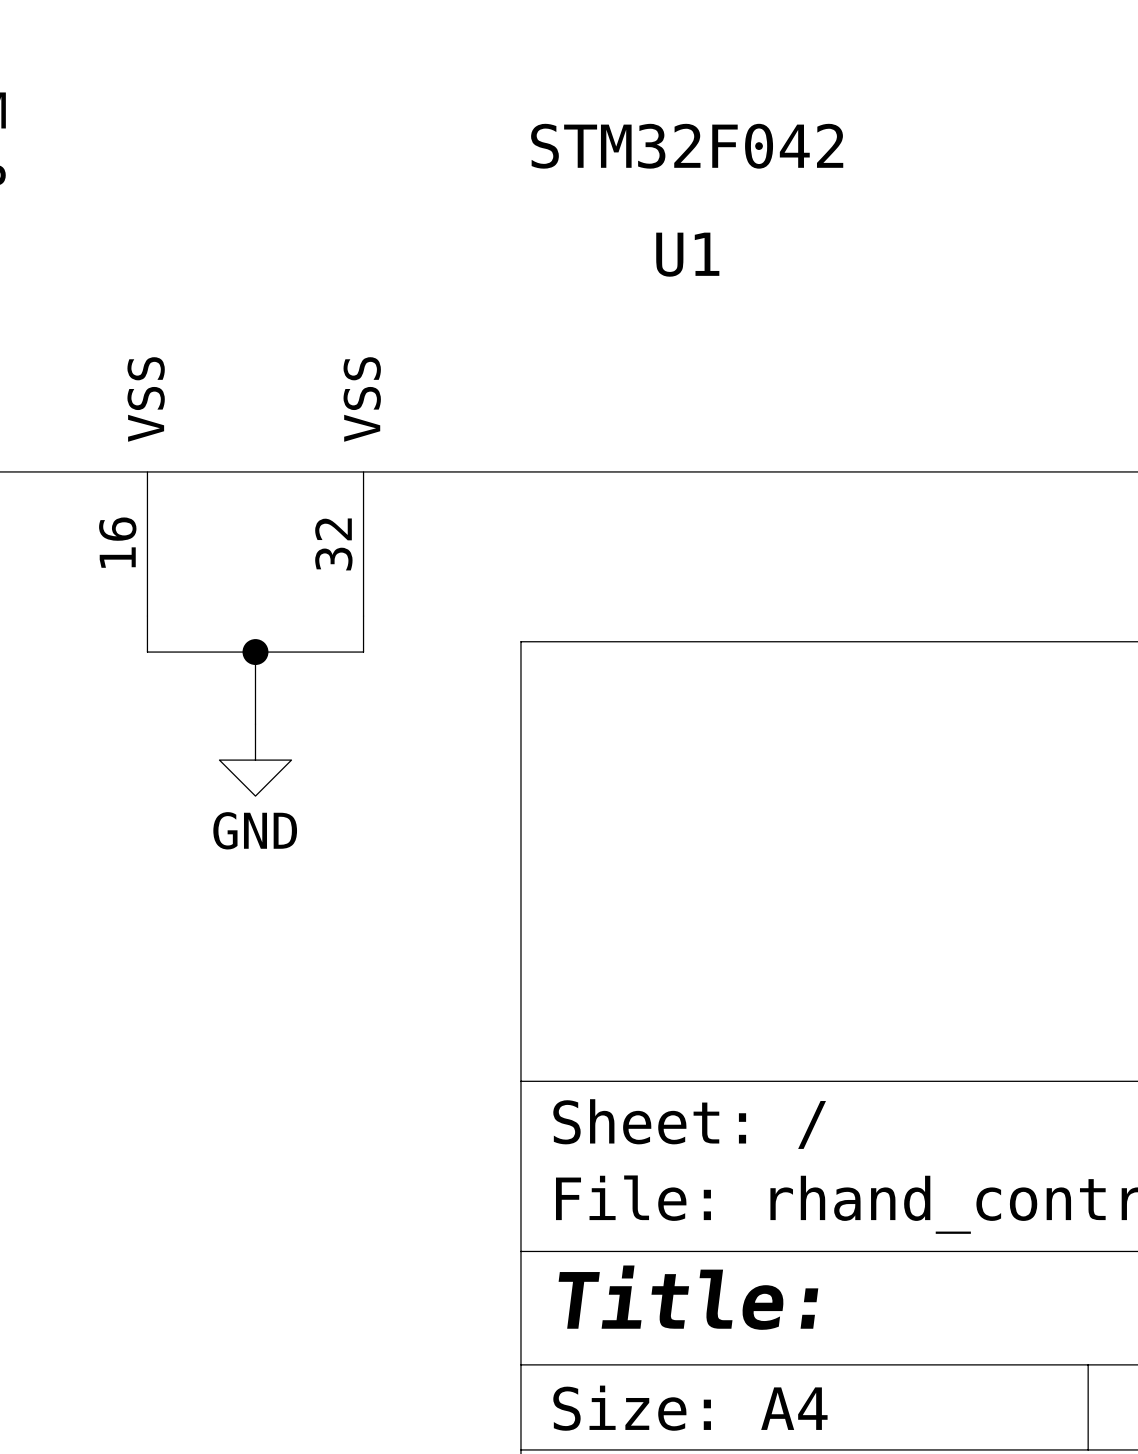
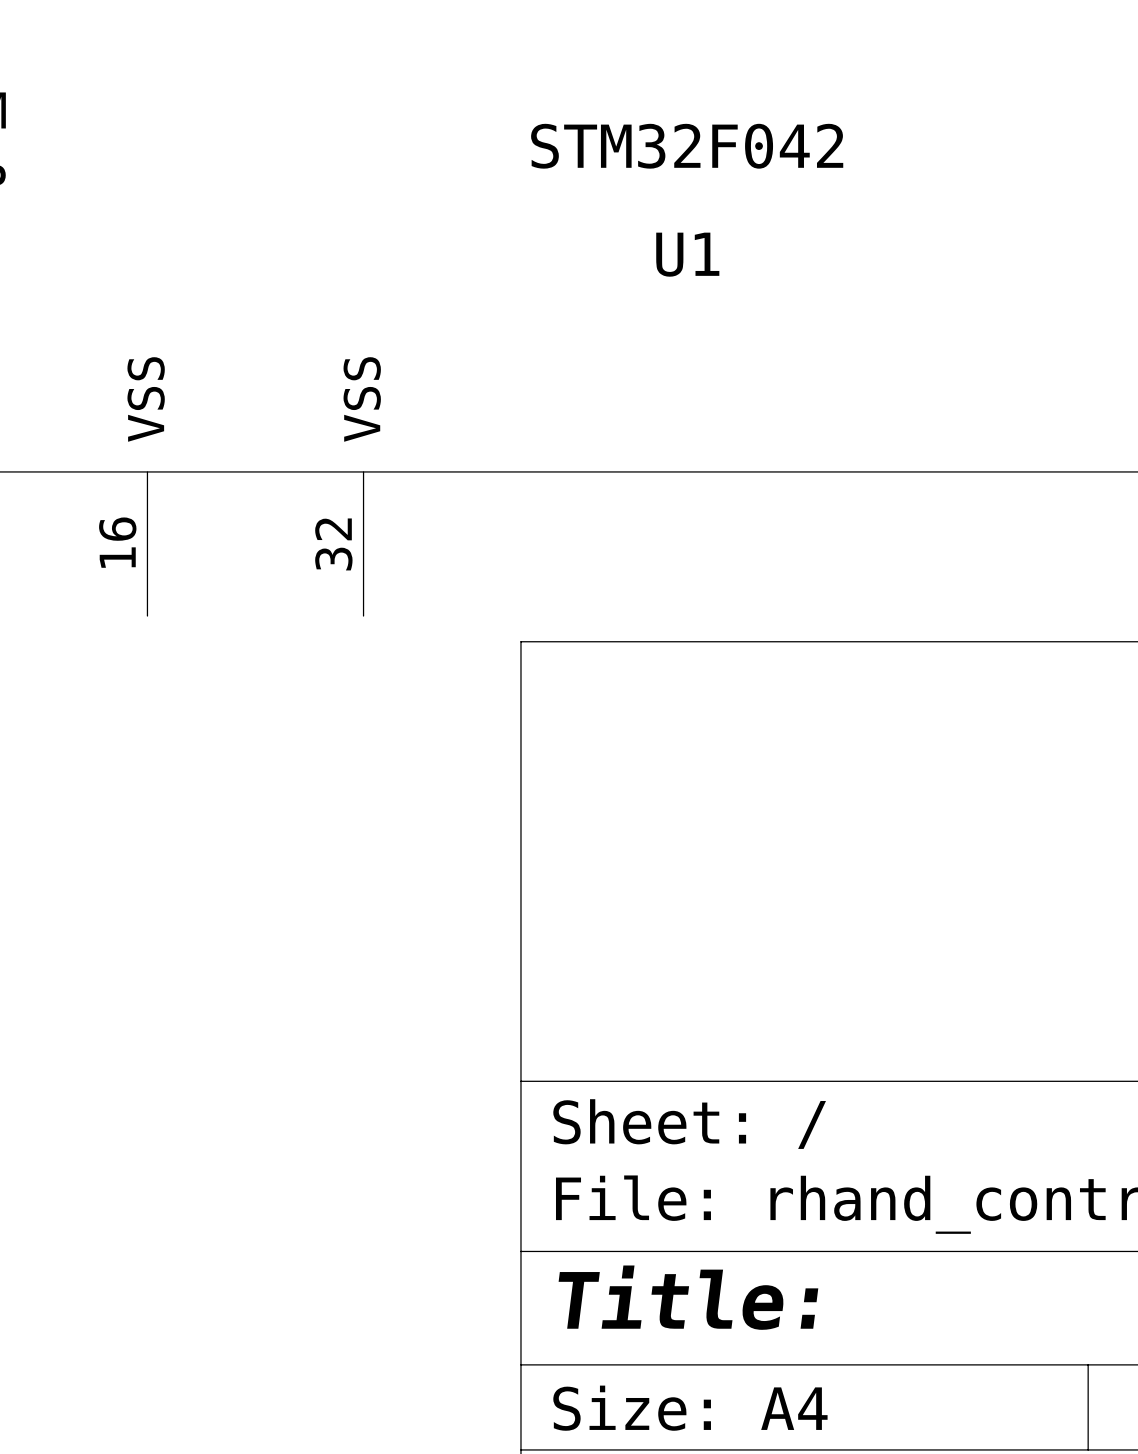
wire: (147, 616) (147, 652) (363, 652) (363, 616) -> none
wire: (255, 652) (255, 724) -> none
junction: (255, 652) -> none
power symbol: GND (255, 760) -> none

